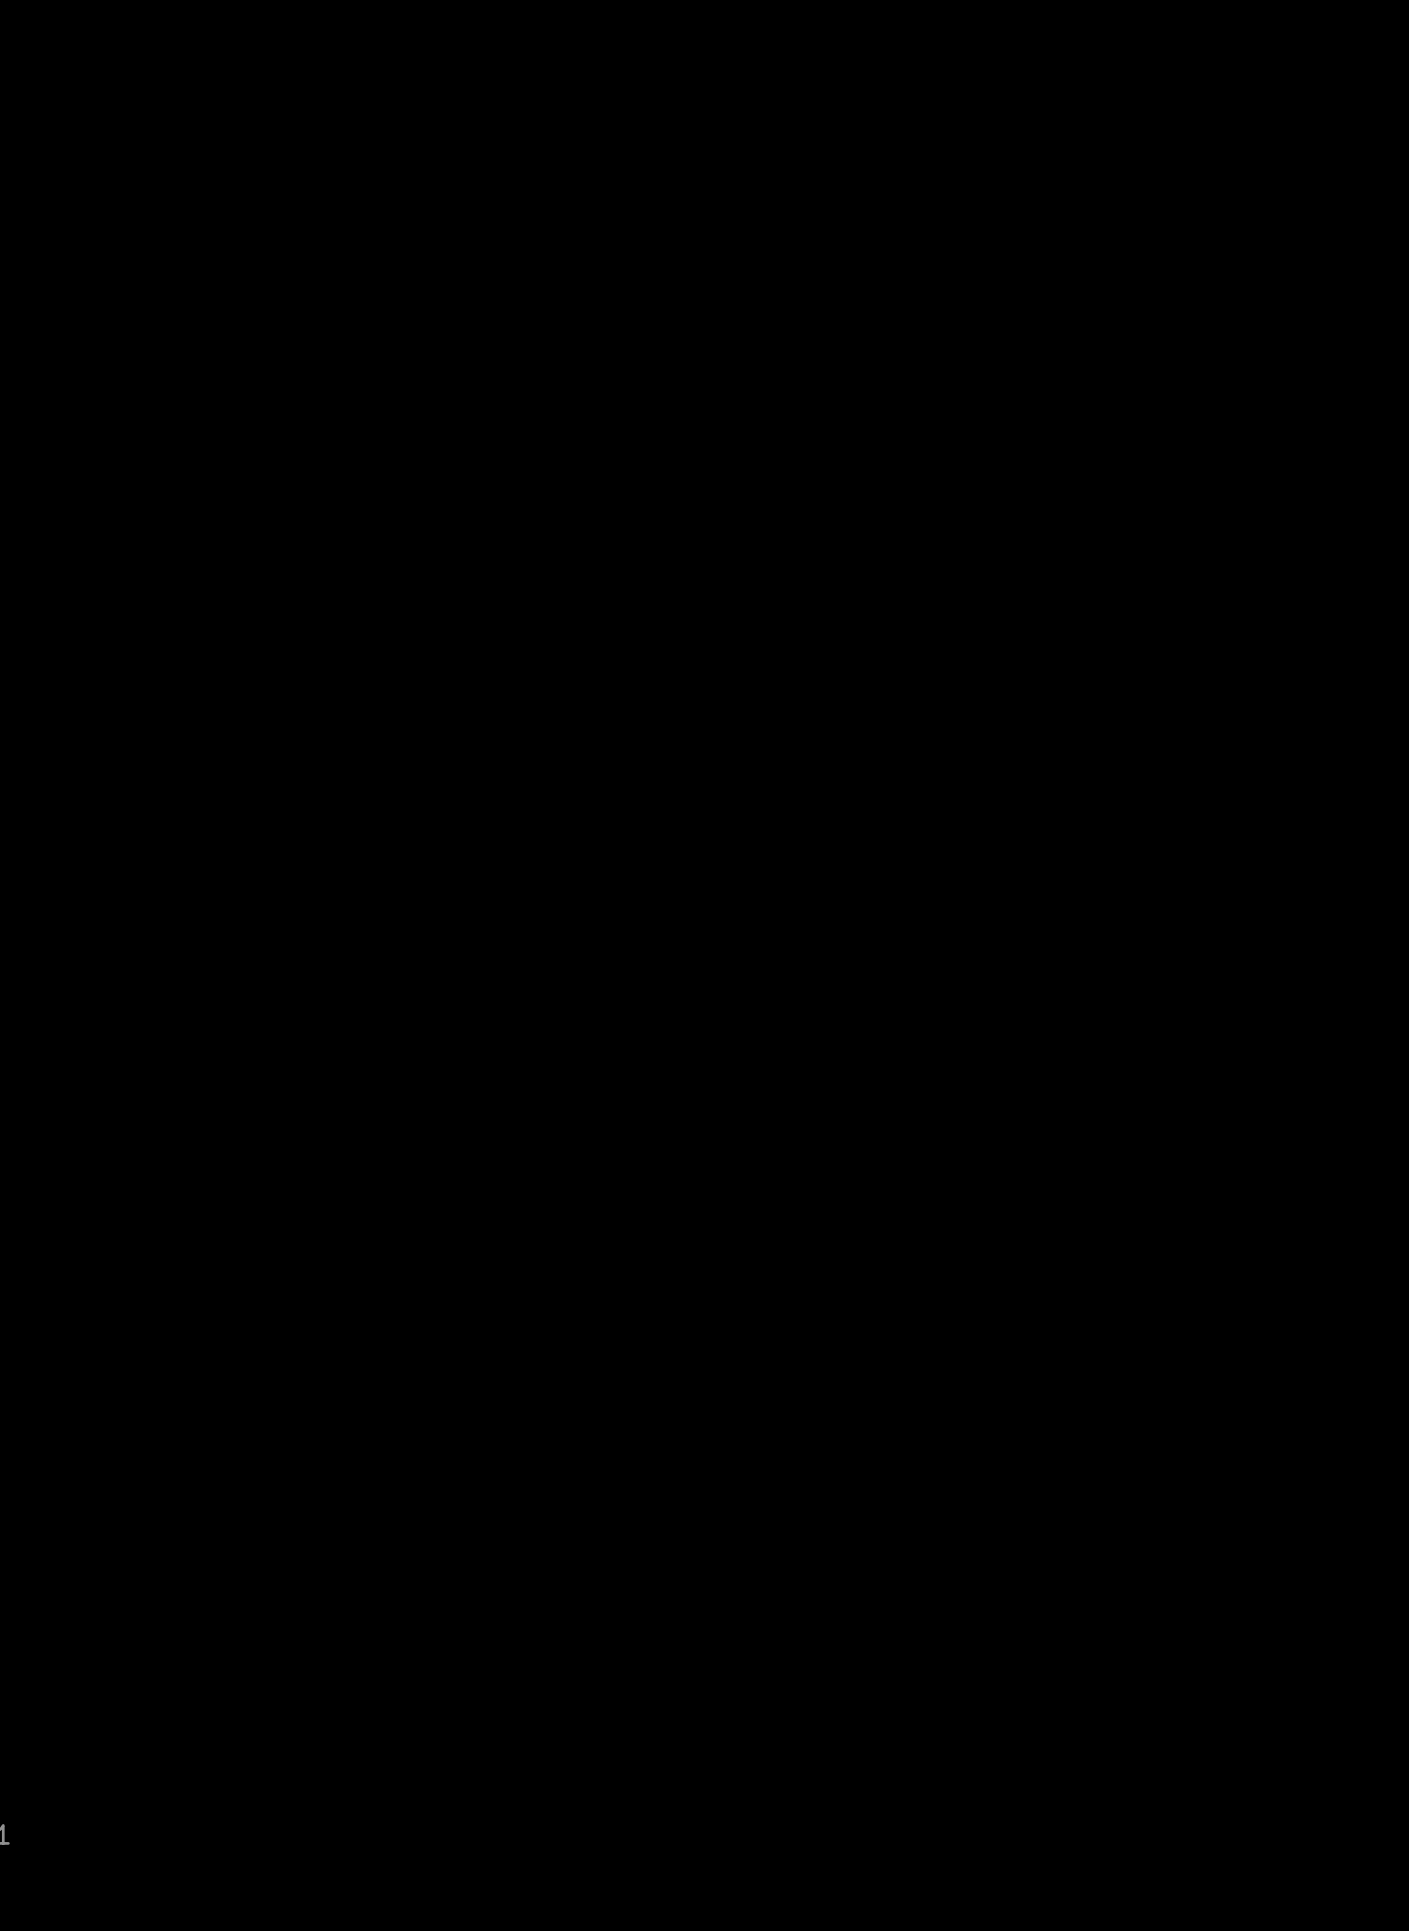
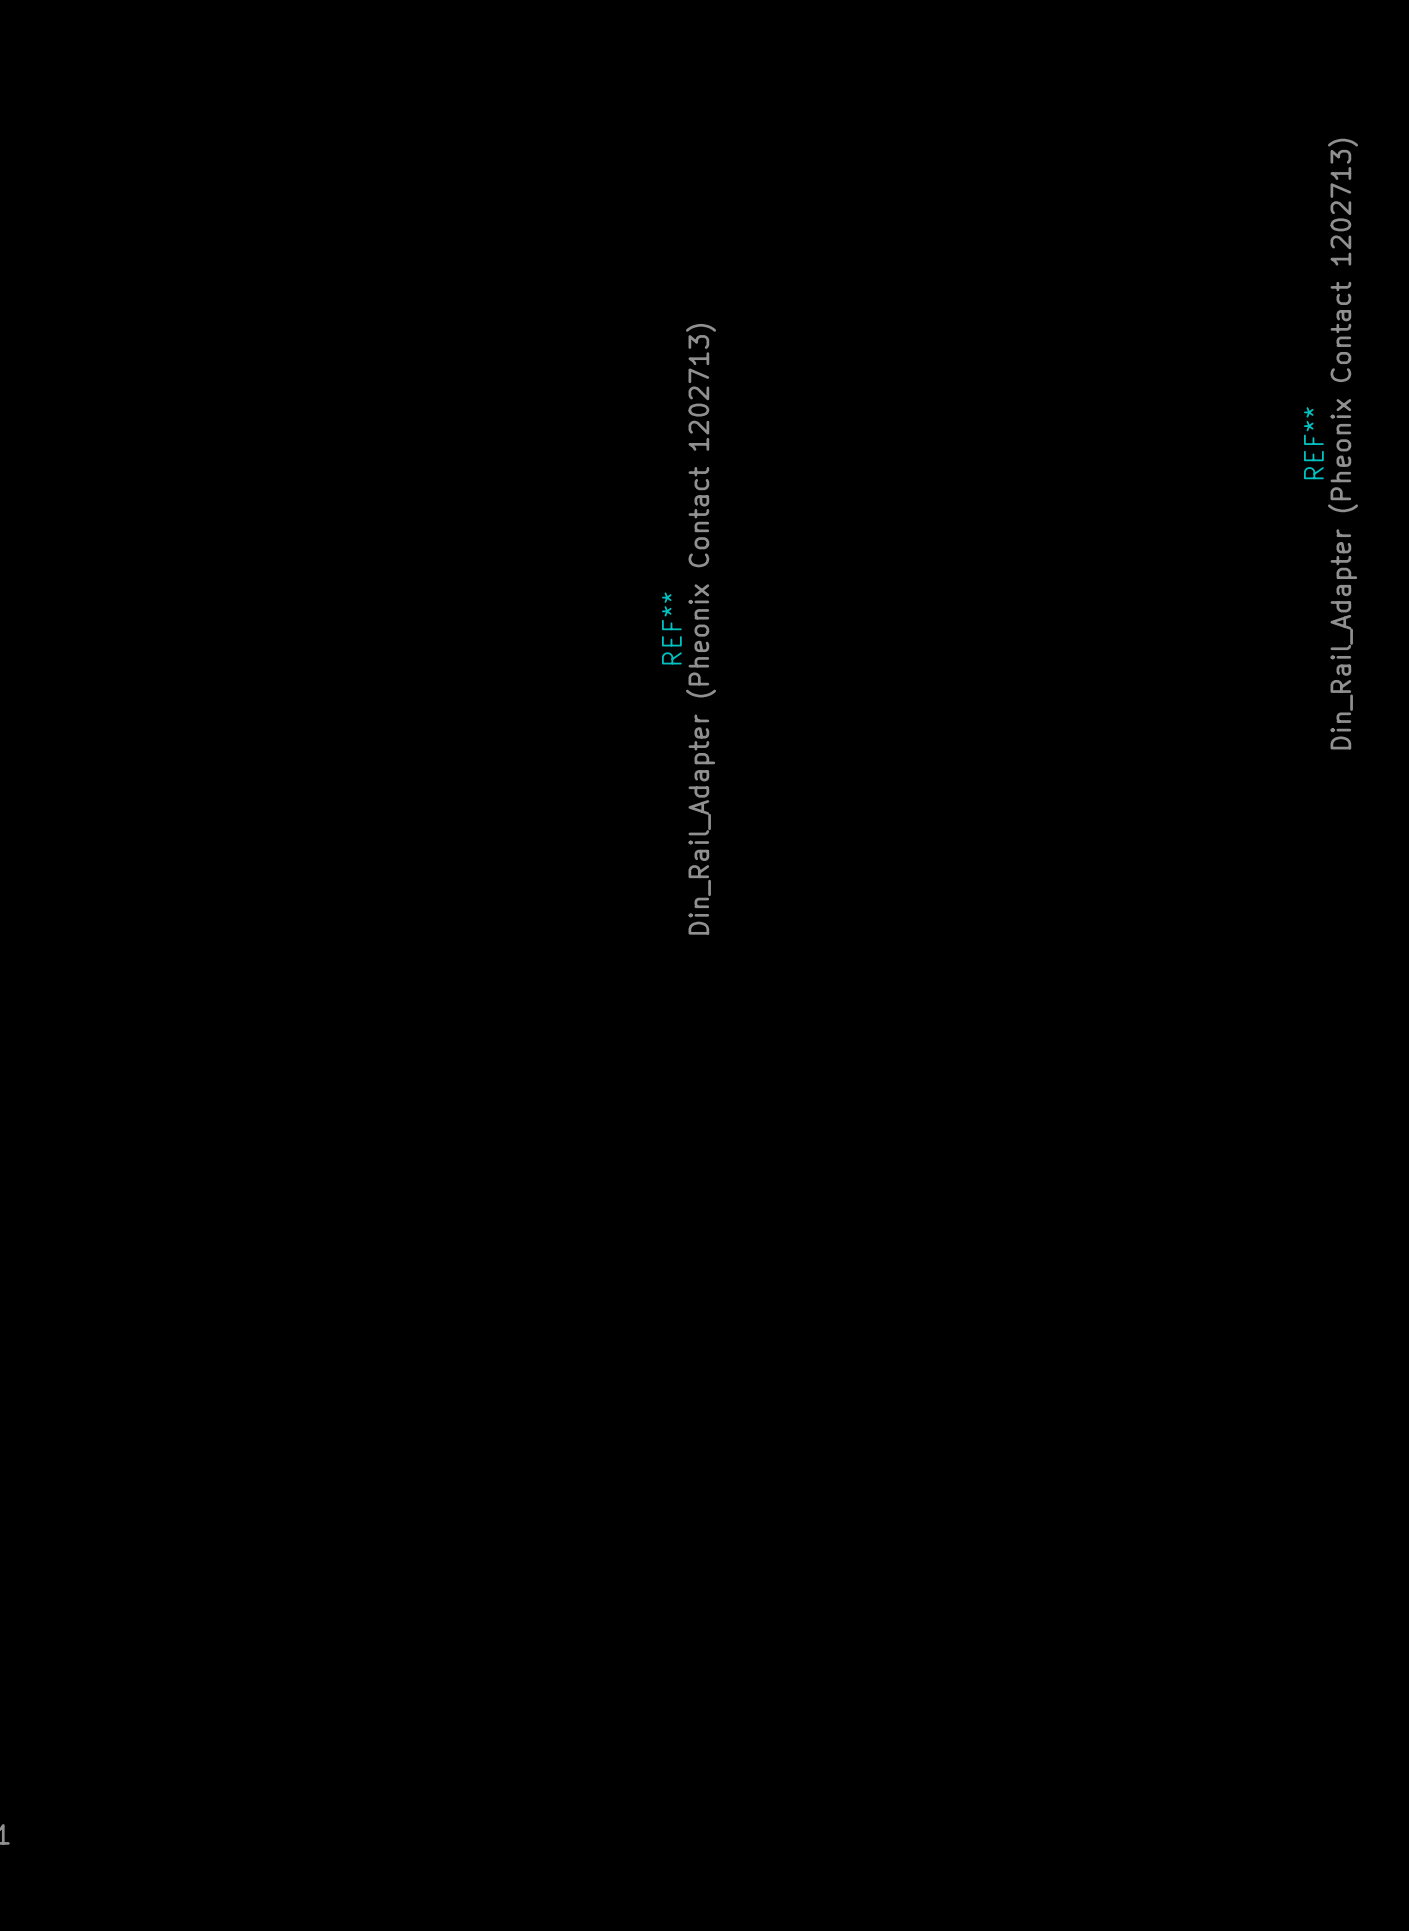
REF**: none -> Din_Rail_Adapter (Pheonix Contact 1202713) (1331, 444)
REF**: none -> Din_Rail_Adapter (Pheonix Contact 1202713) (689, 629)

